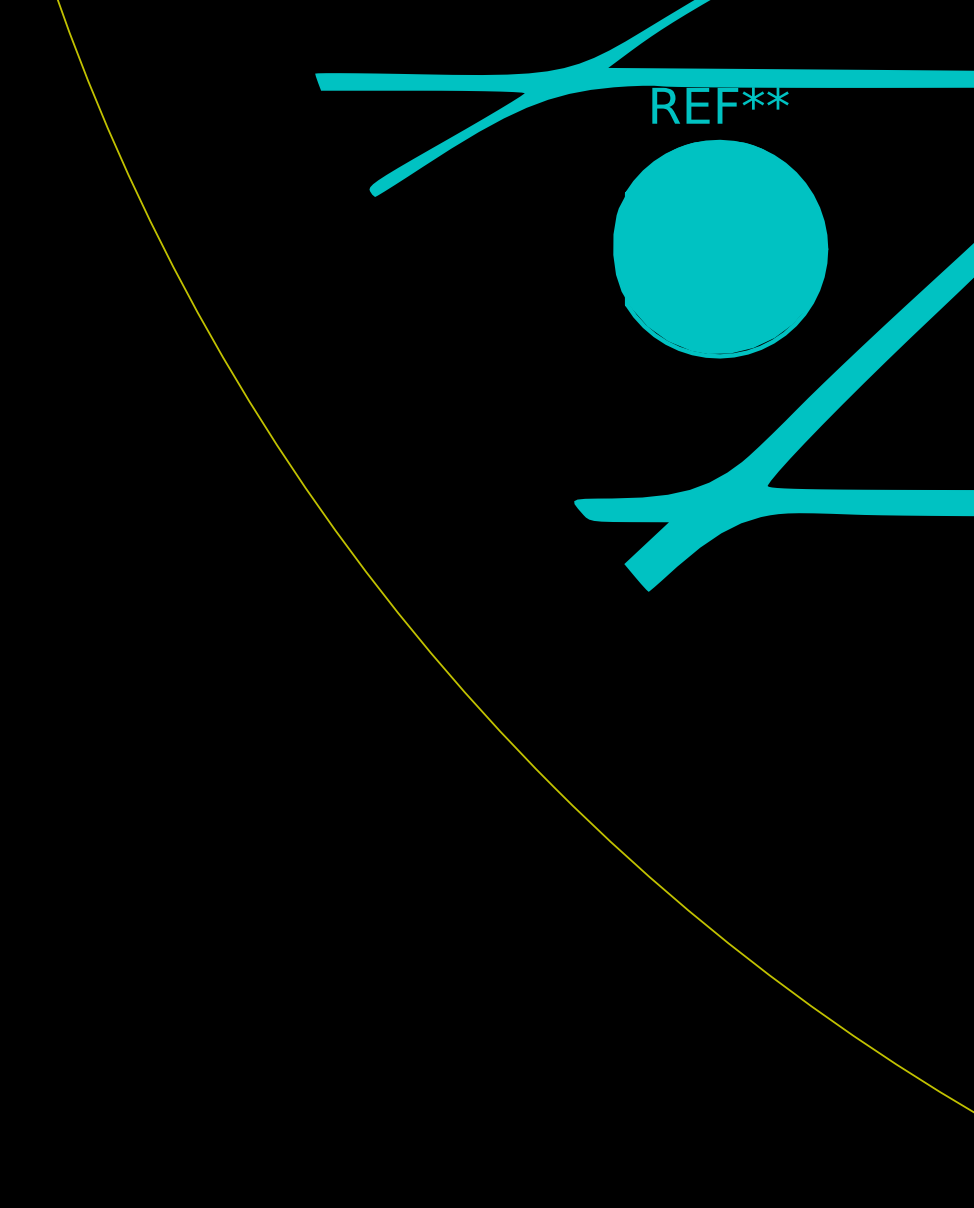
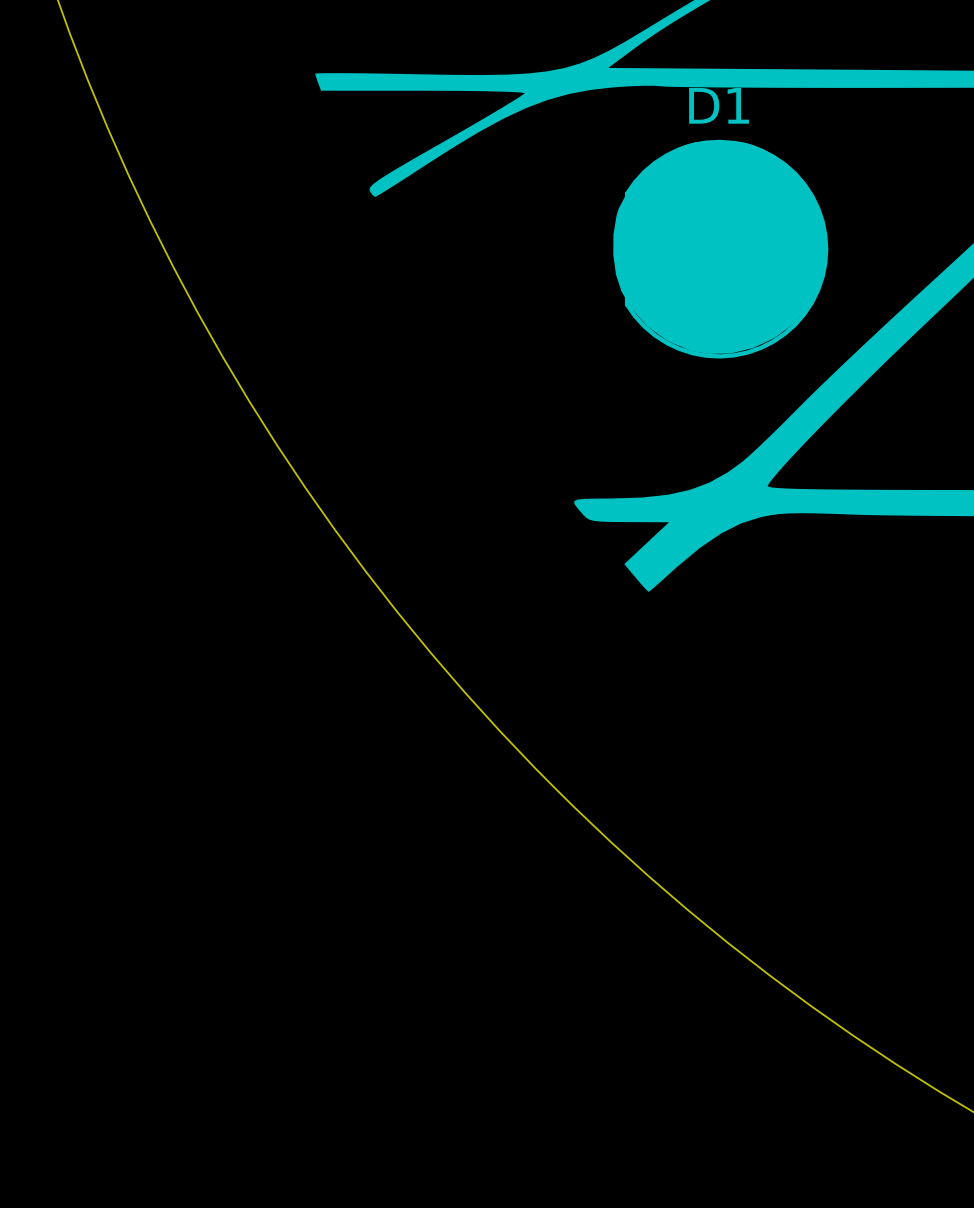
REF** name: REF** (720, 105) -> D1 (719, 105)

